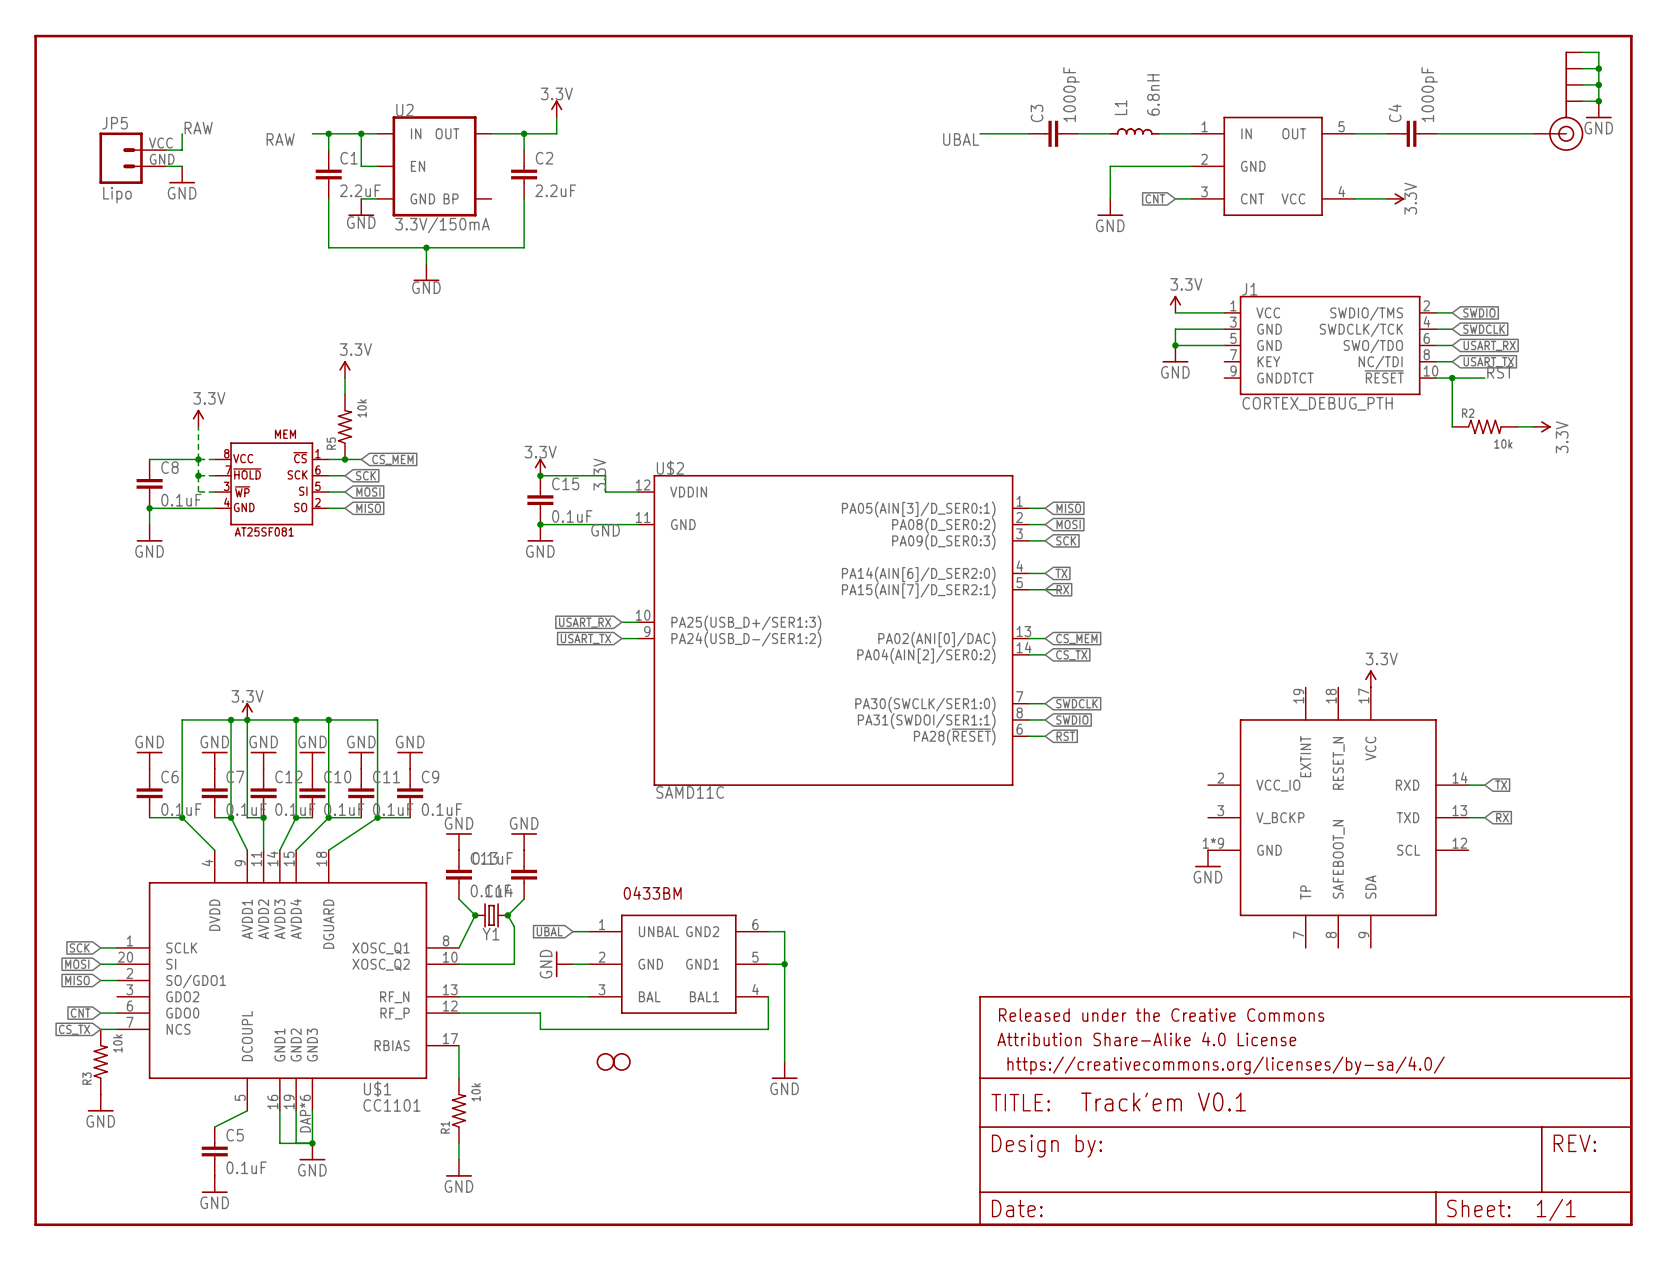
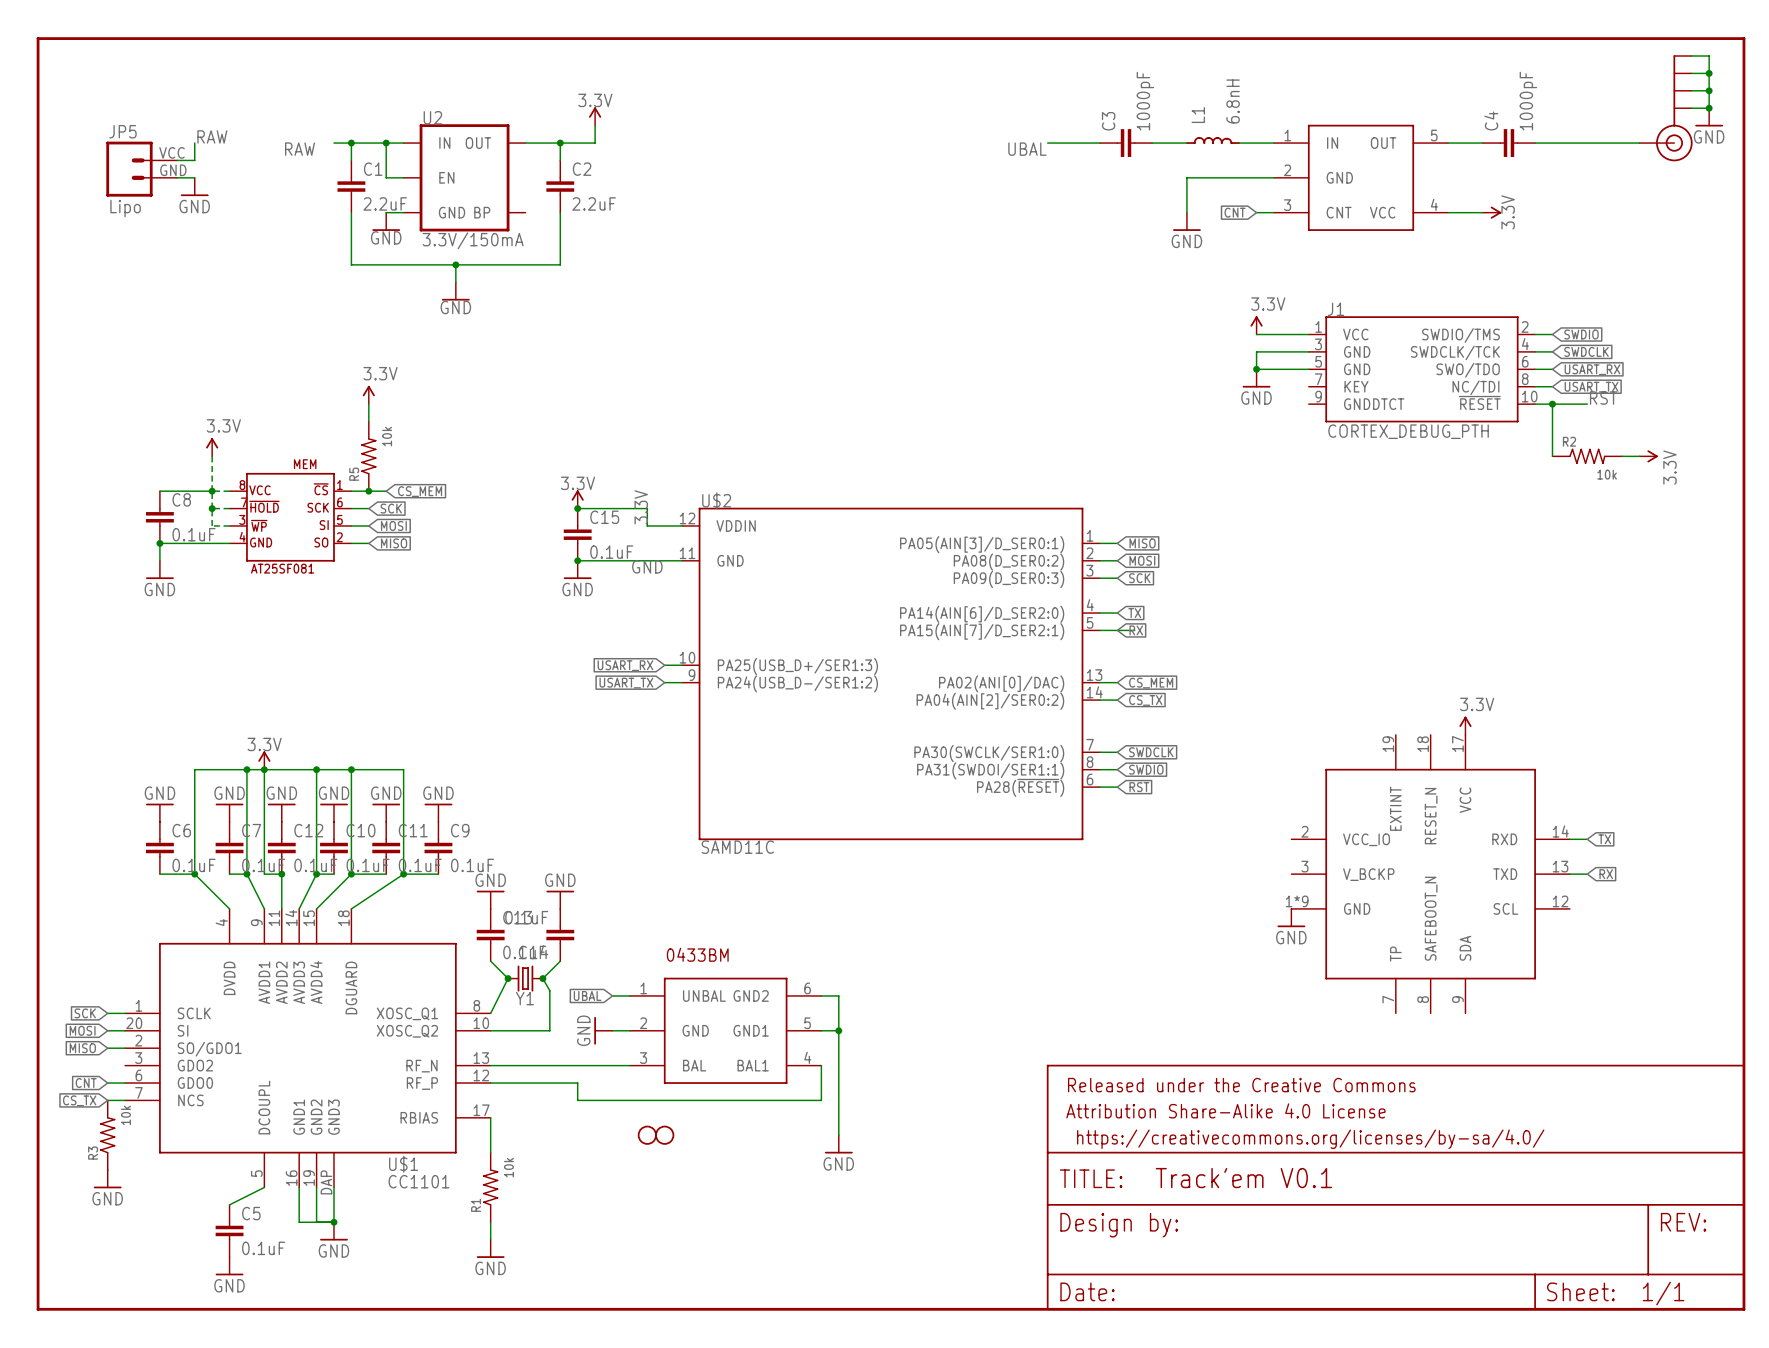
U$1 pin number: DAP*6 (305, 1113) -> DAP (326, 1182)

